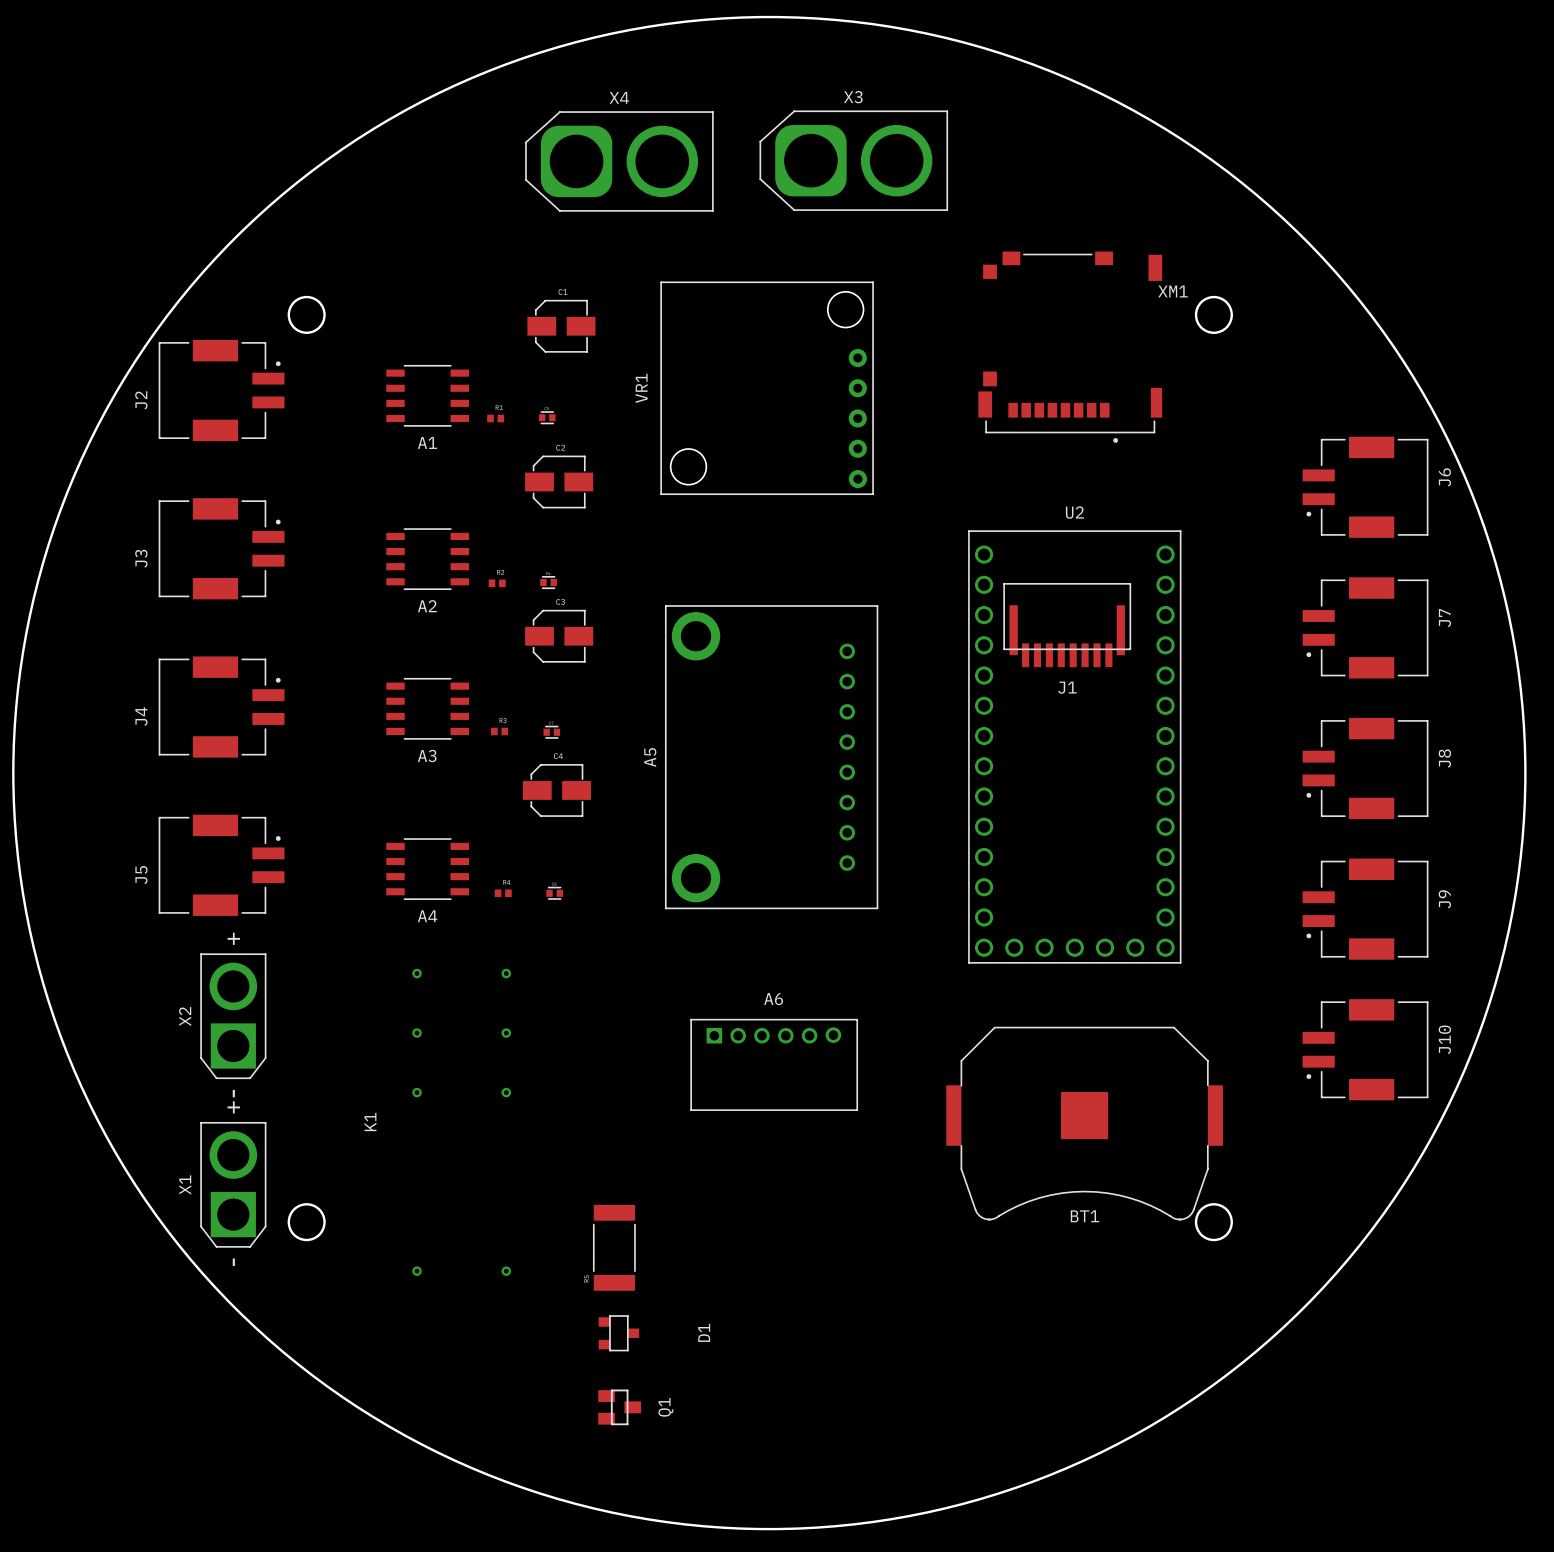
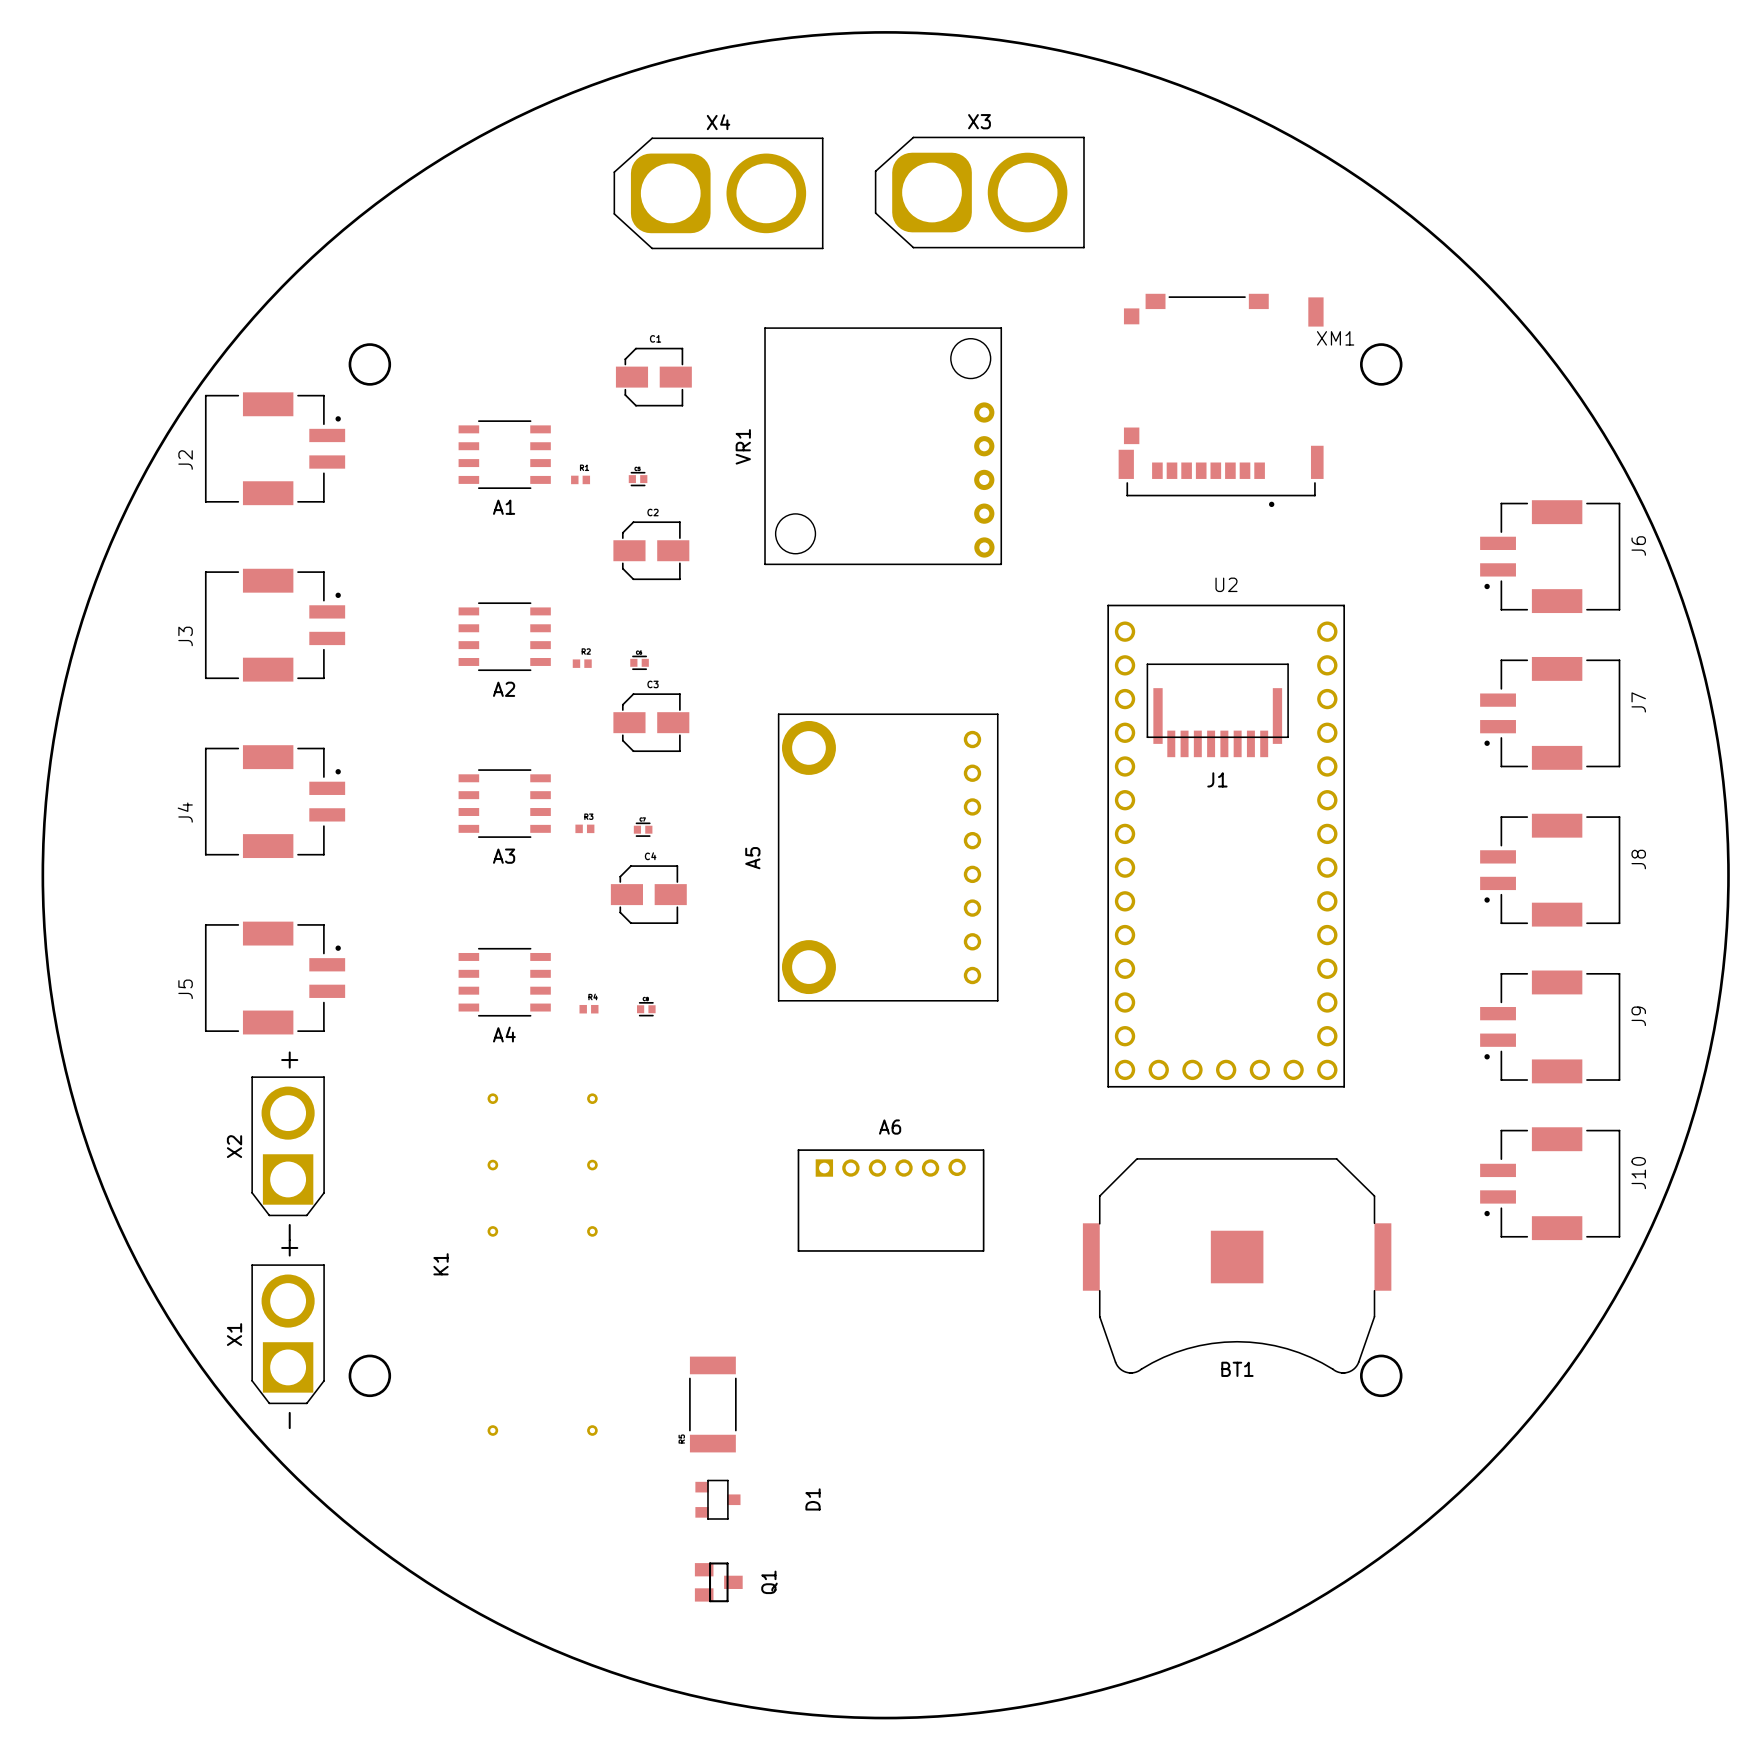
A5 footprint: [665, 605, 879, 910] -> [777, 713, 999, 1002]

